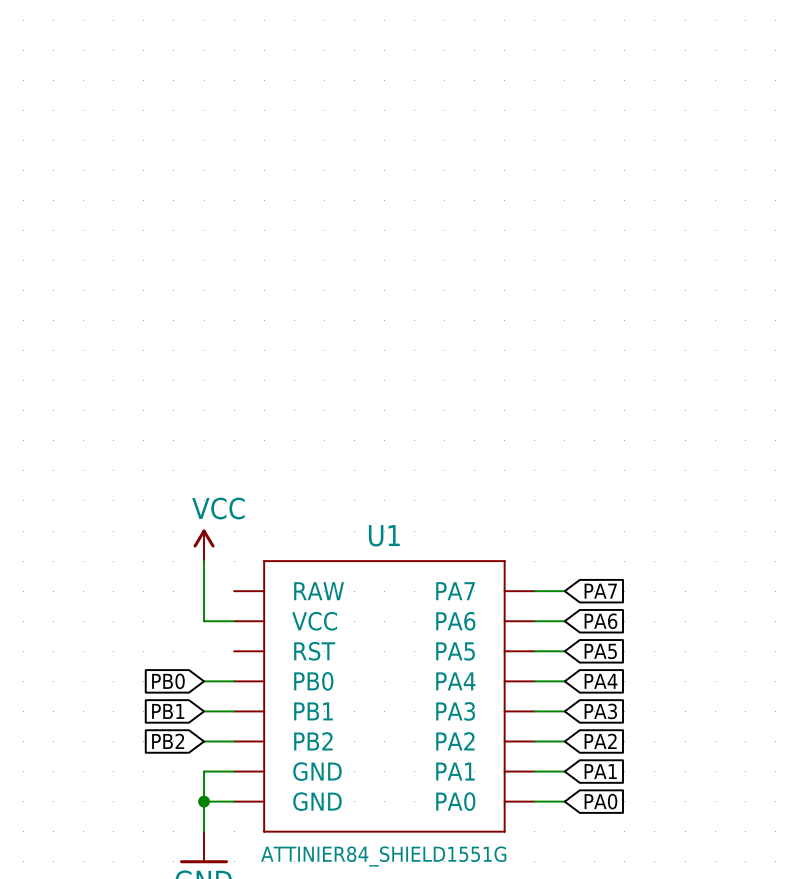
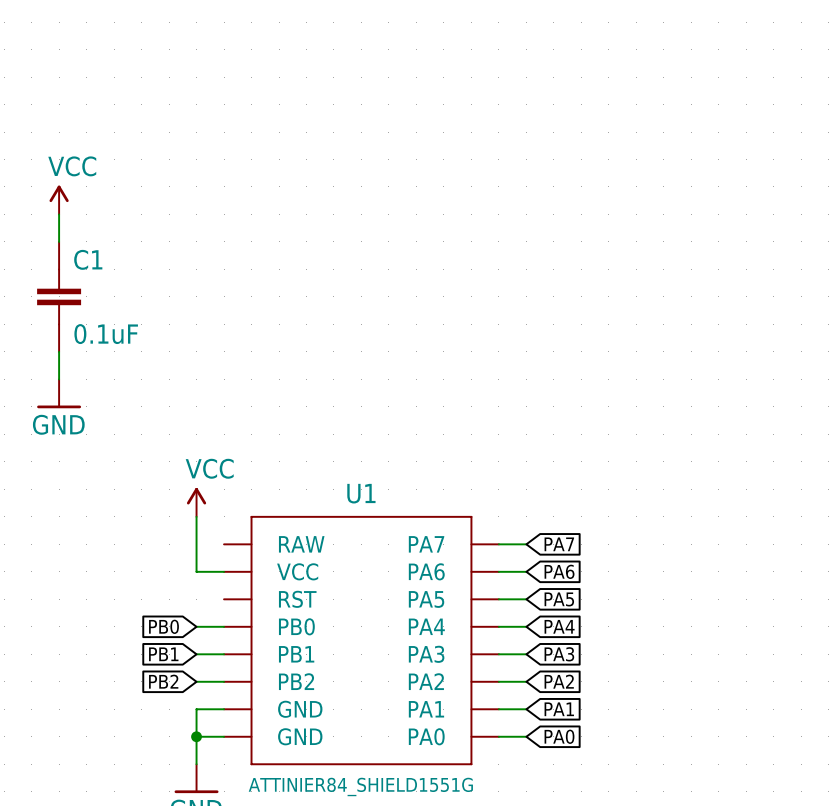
power symbol: none -> VCC (59, 200)
wire: none -> (59, 214) (59, 241)
C1: none -> 0.1uF (59, 296)
wire: none -> (59, 351) (59, 379)
power symbol: none -> GND (59, 393)

